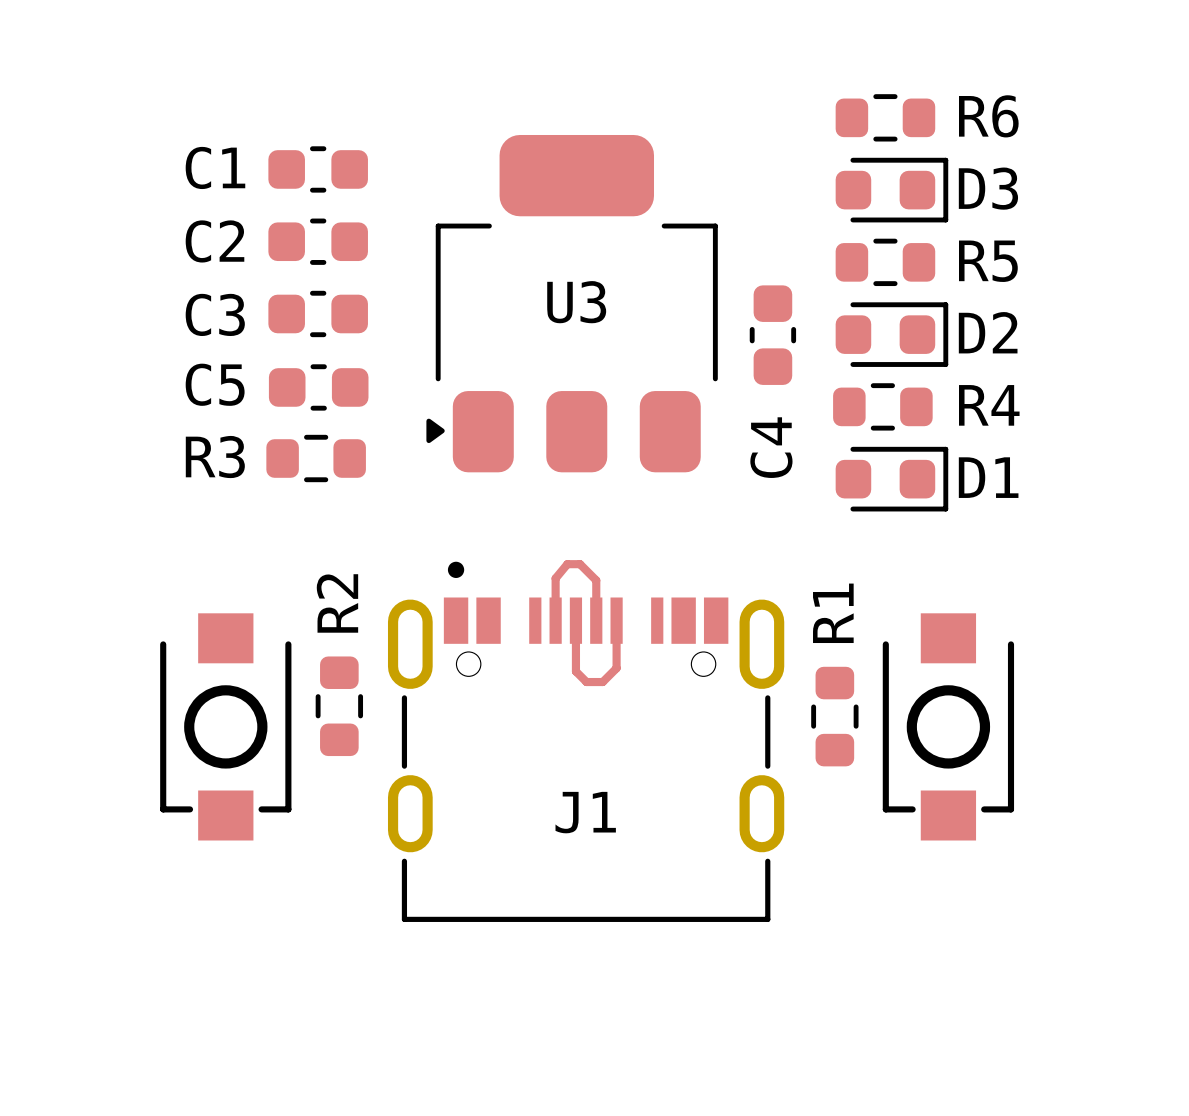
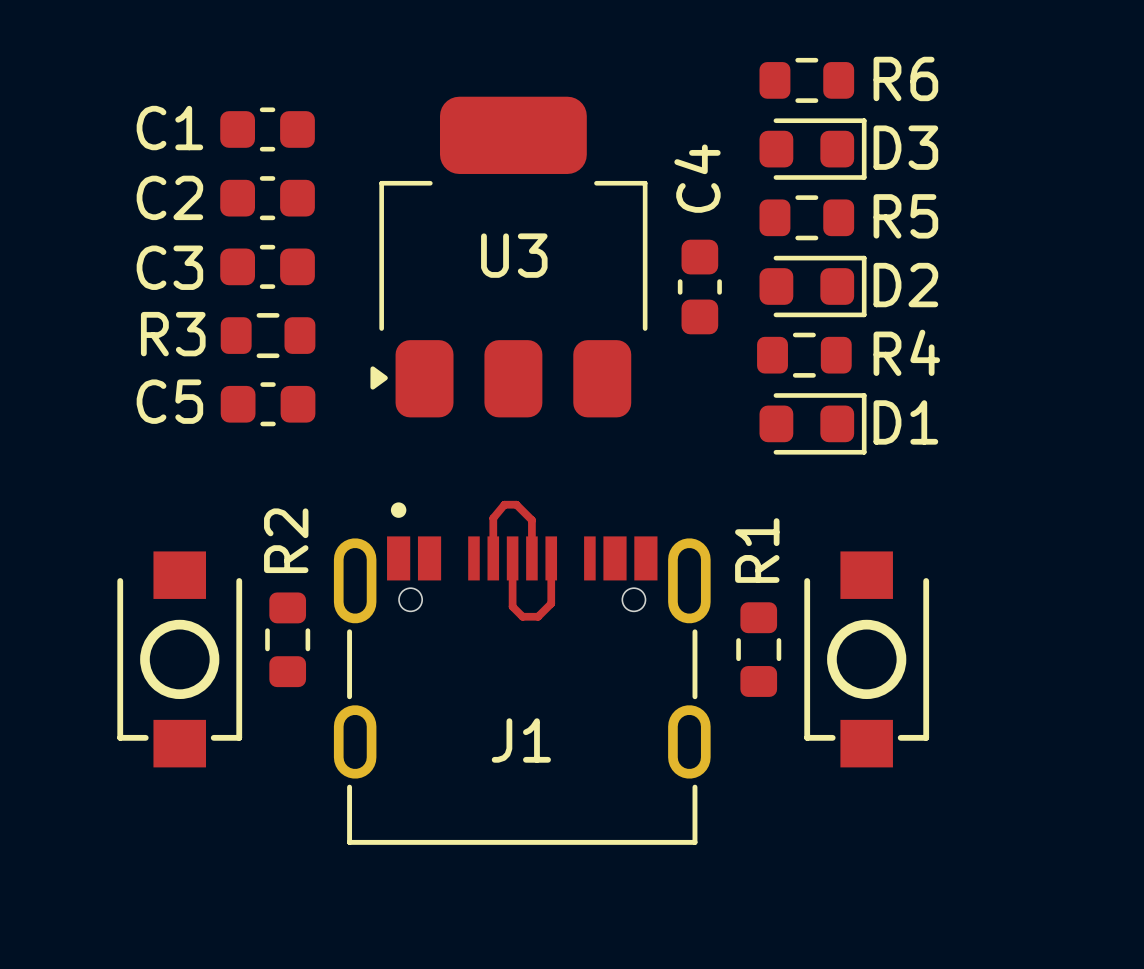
C5 position: (318, 387) -> (268, 404)
C4 name position: C4 (771, 447) -> C4 (697, 178)
R3 position: (316, 458) -> (268, 335)

